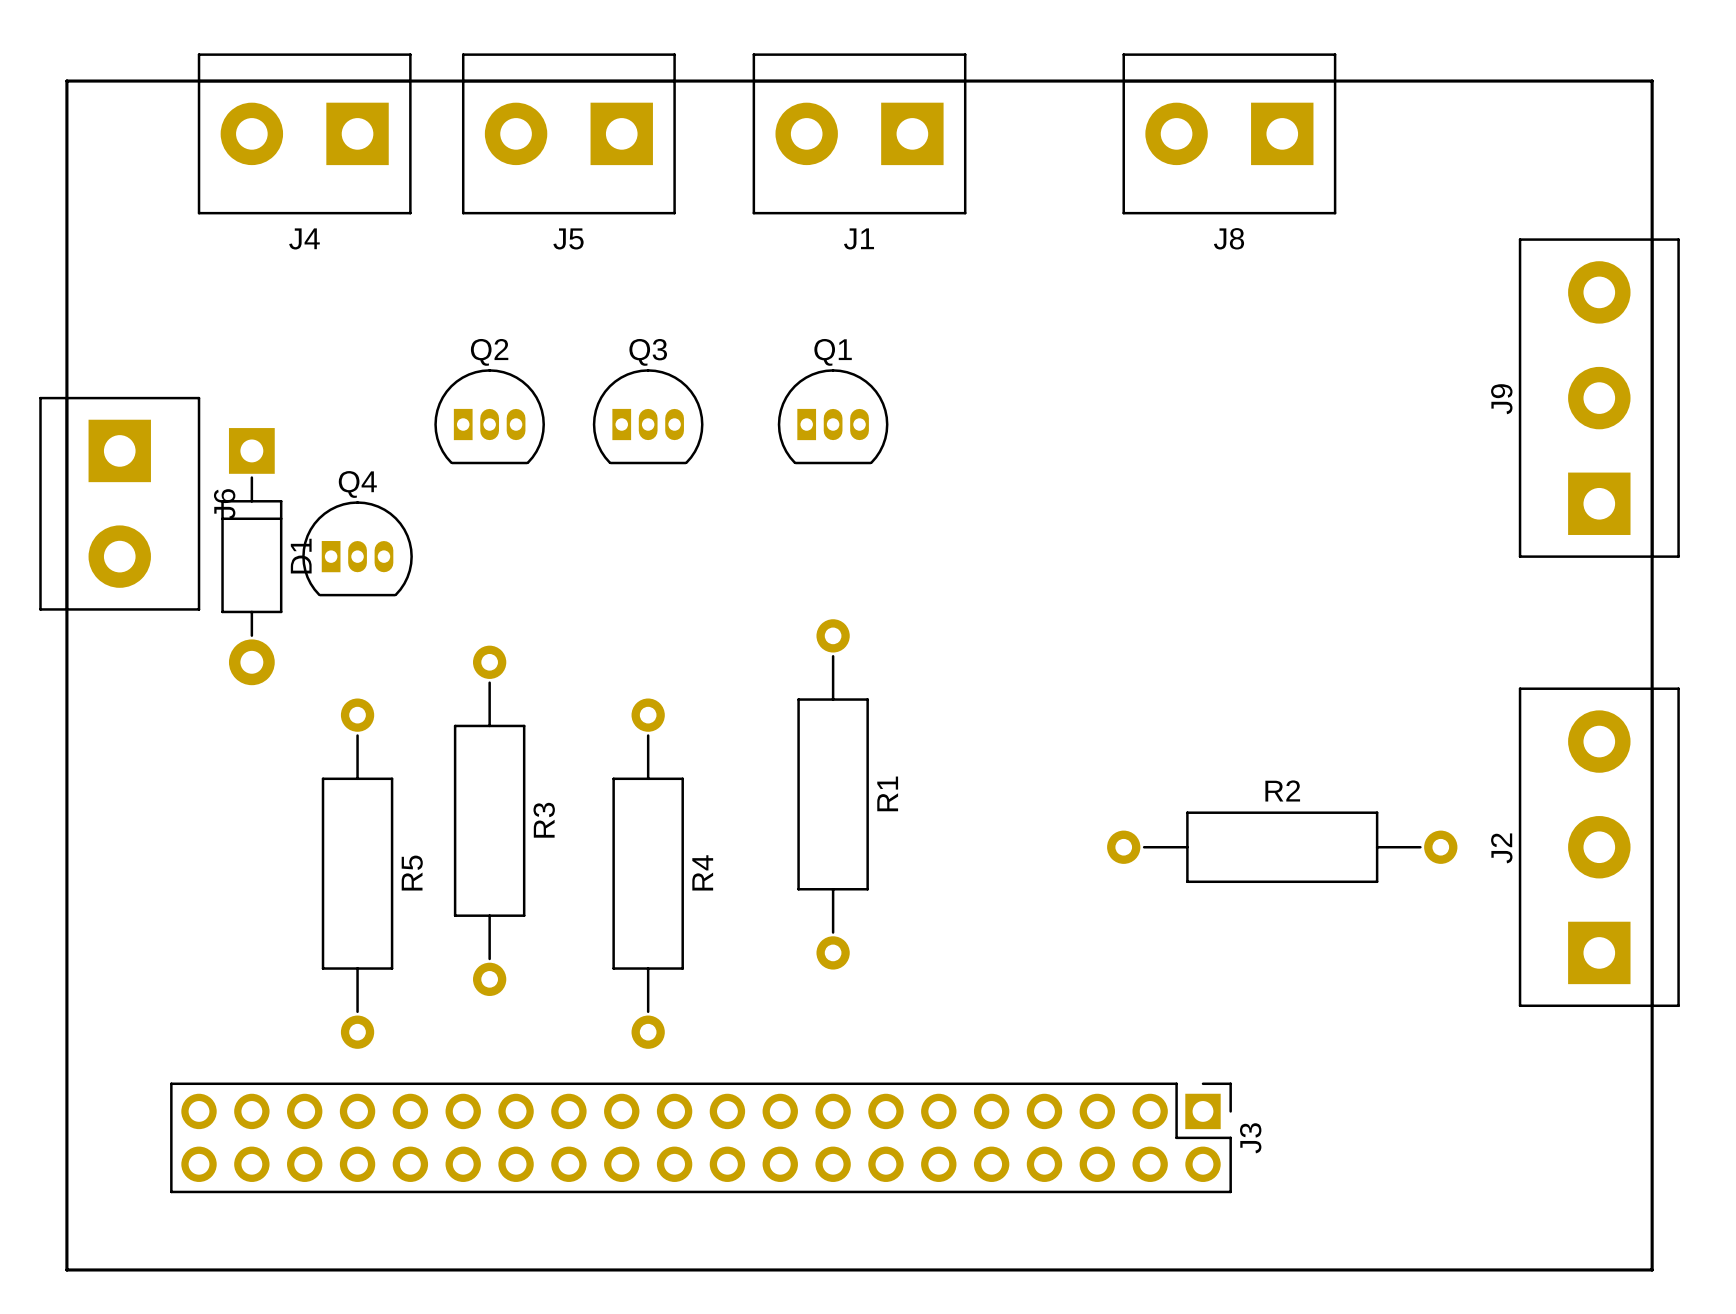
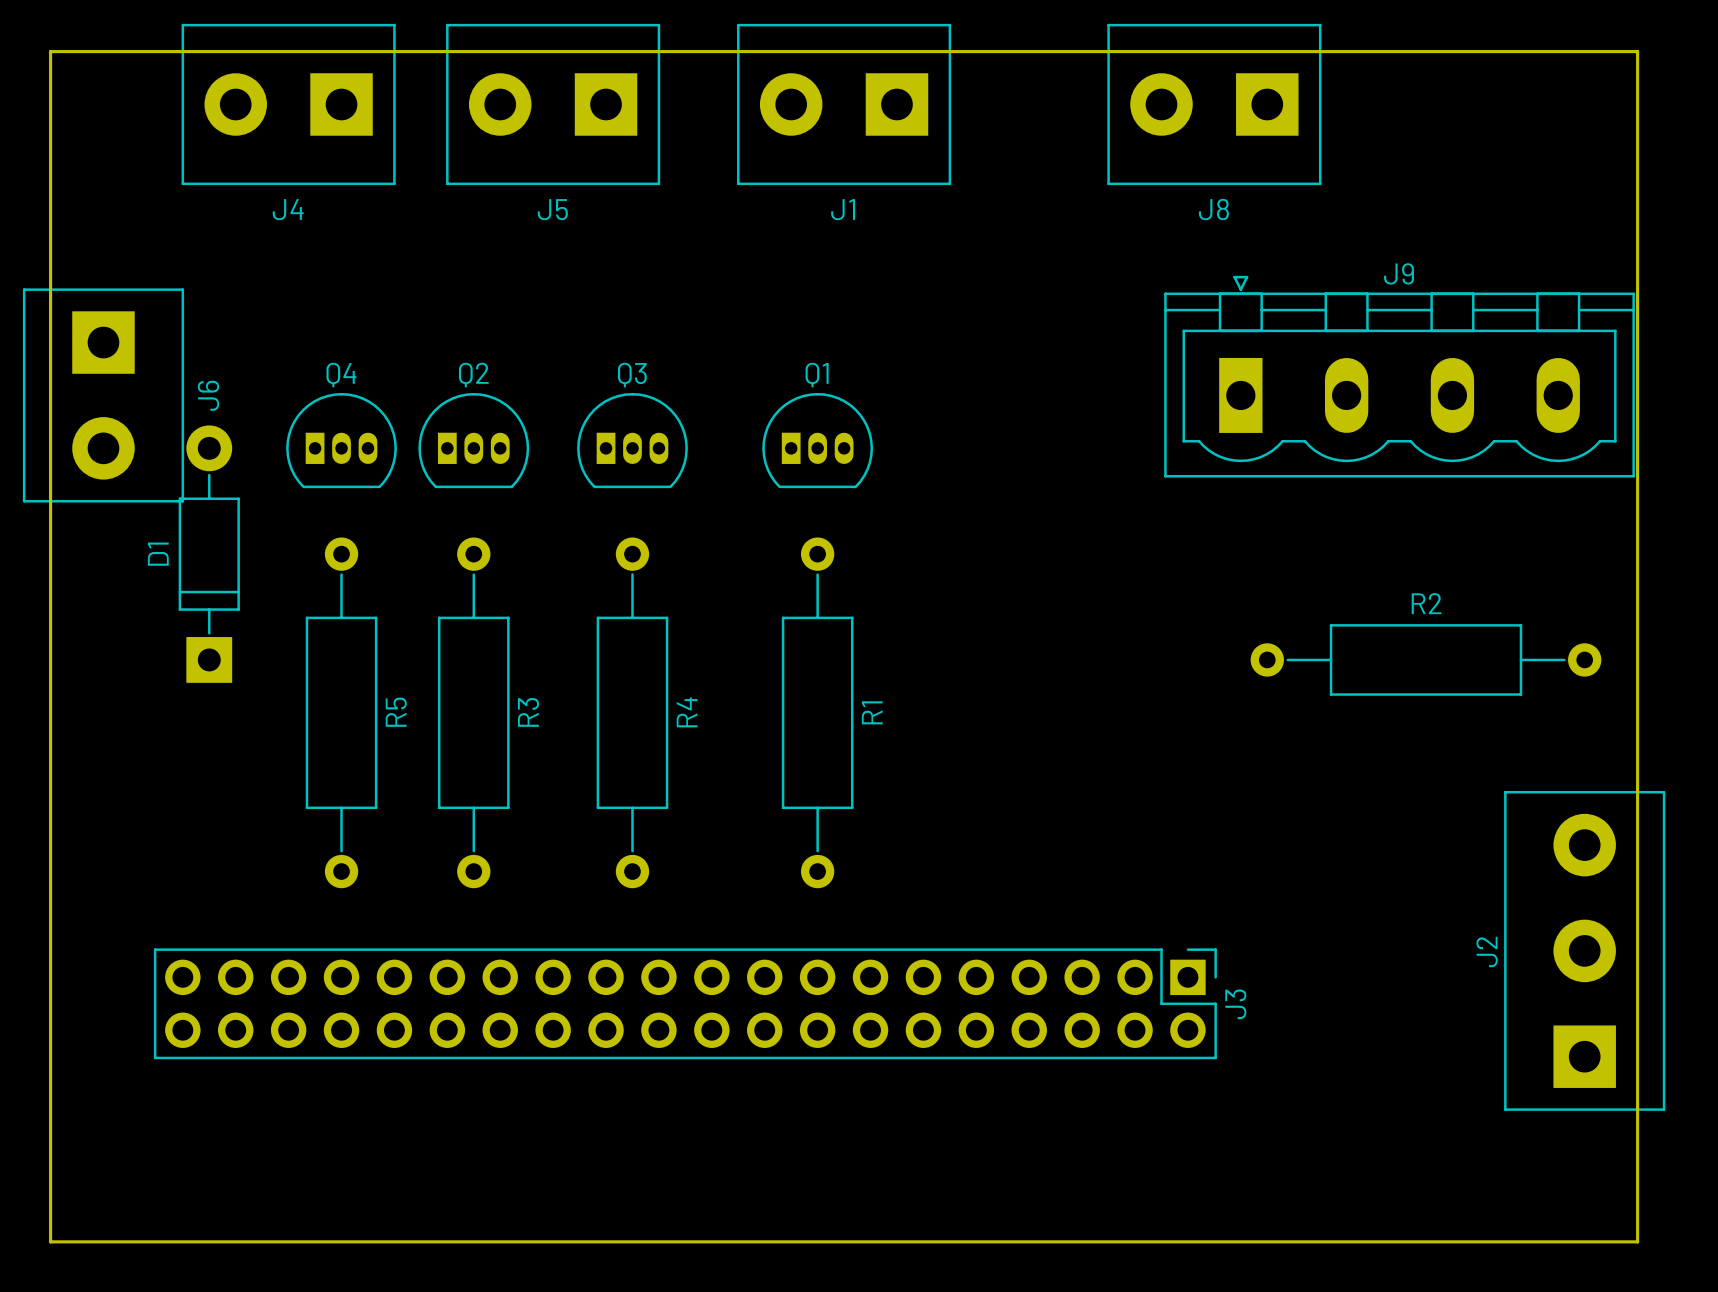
J9 footprint: [1518, 238, 1680, 558] -> [1164, 275, 1635, 478]
J9 name position: J9 (1501, 399) -> J9 (1399, 273)
Q2 position: (489, 416) -> (473, 440)
Q3 position: (648, 416) -> (632, 440)
Q1 position: (833, 416) -> (817, 440)
J6 position: (119, 503) -> (103, 395)
Q4 position: (357, 548) -> (341, 440)
D1 rotation: 0° (251, 556) -> 180° (209, 554)
R1 position: (833, 794) -> (817, 712)
R3 position: (489, 820) -> (473, 712)
R2 position: (1282, 847) -> (1425, 659)
J2 position: (1599, 847) -> (1584, 950)
R5 position: (357, 873) -> (341, 712)
R4 position: (648, 873) -> (632, 712)
J3 position: (701, 1137) -> (685, 1003)

